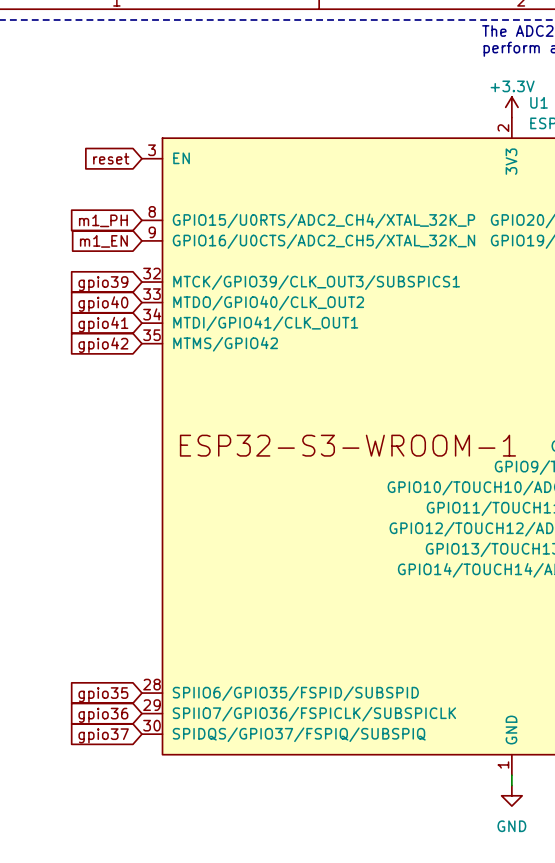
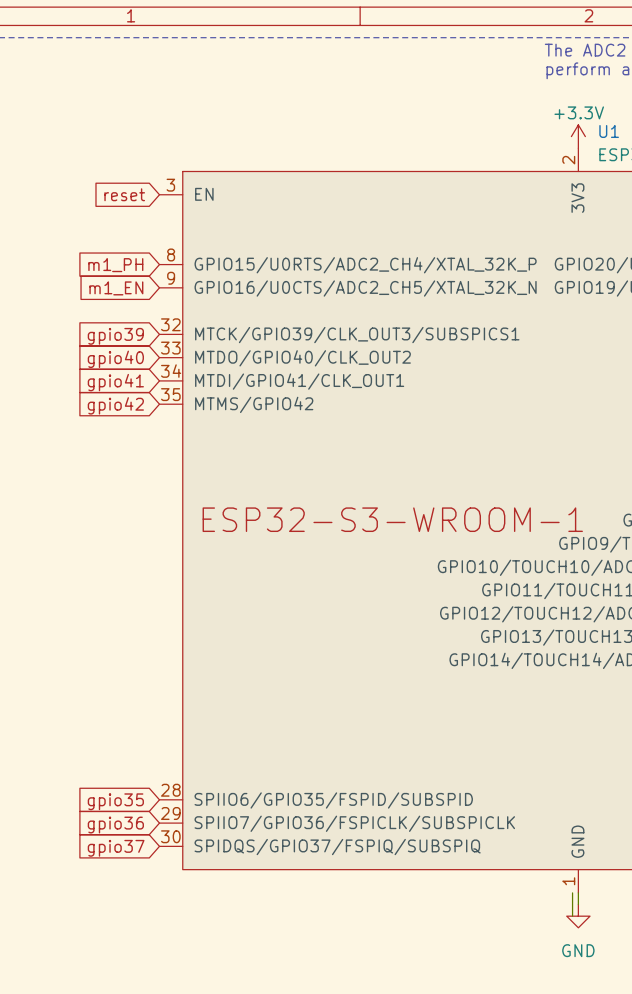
wire: none -> (572, 892) (572, 916)

